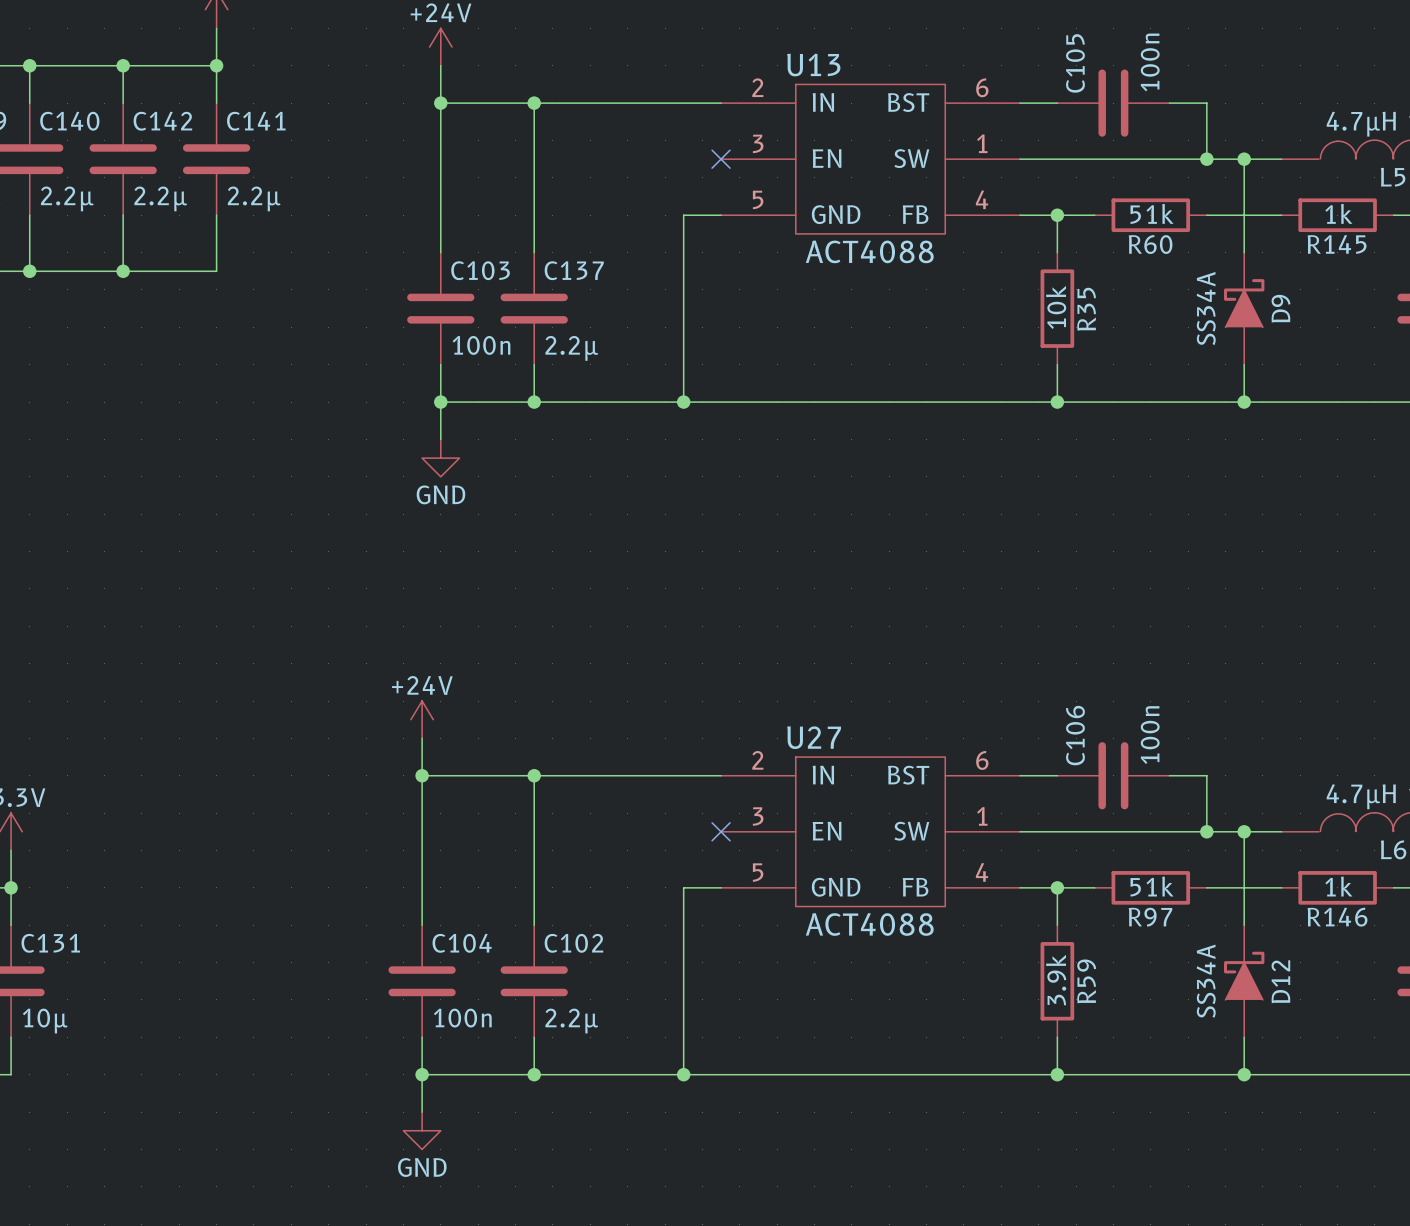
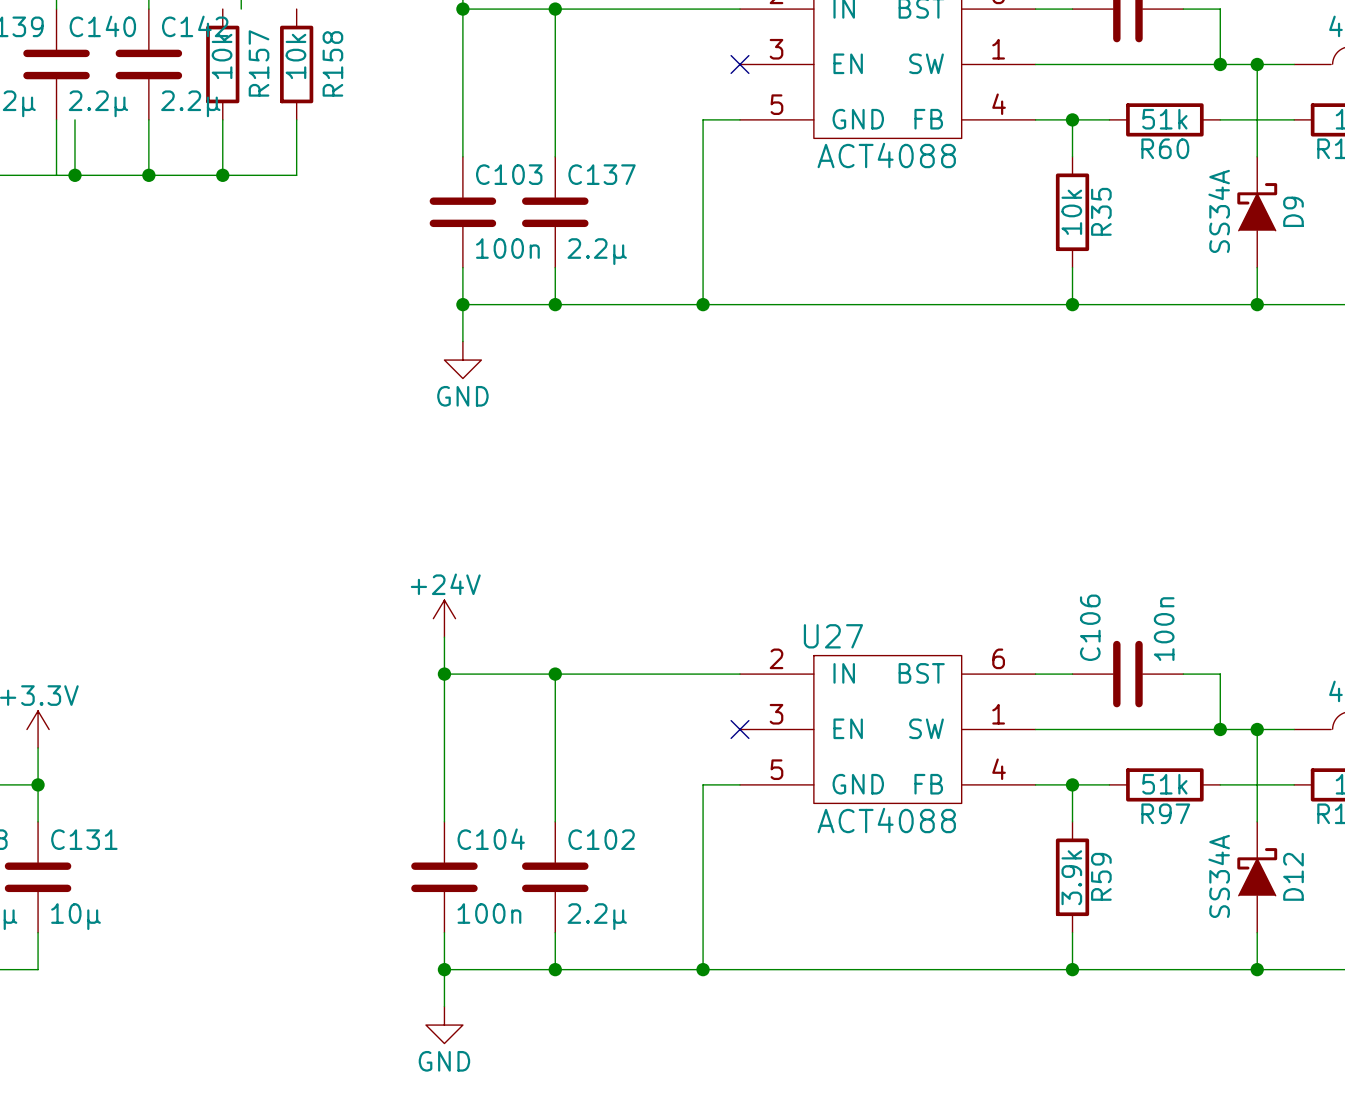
R157: none -> 10k (222, 64)
C141: 2.2µ (216, 159) -> none
R158: none -> 10k (296, 64)
wire: none -> (74, 119) (74, 175)
wire: none -> (222, 119) (222, 175)
wire: (216, 215) (216, 271) -> (296, 119) (296, 175) (241, 175)
junction position: (29, 271) -> (74, 175)
junction: none -> (222, 175)

